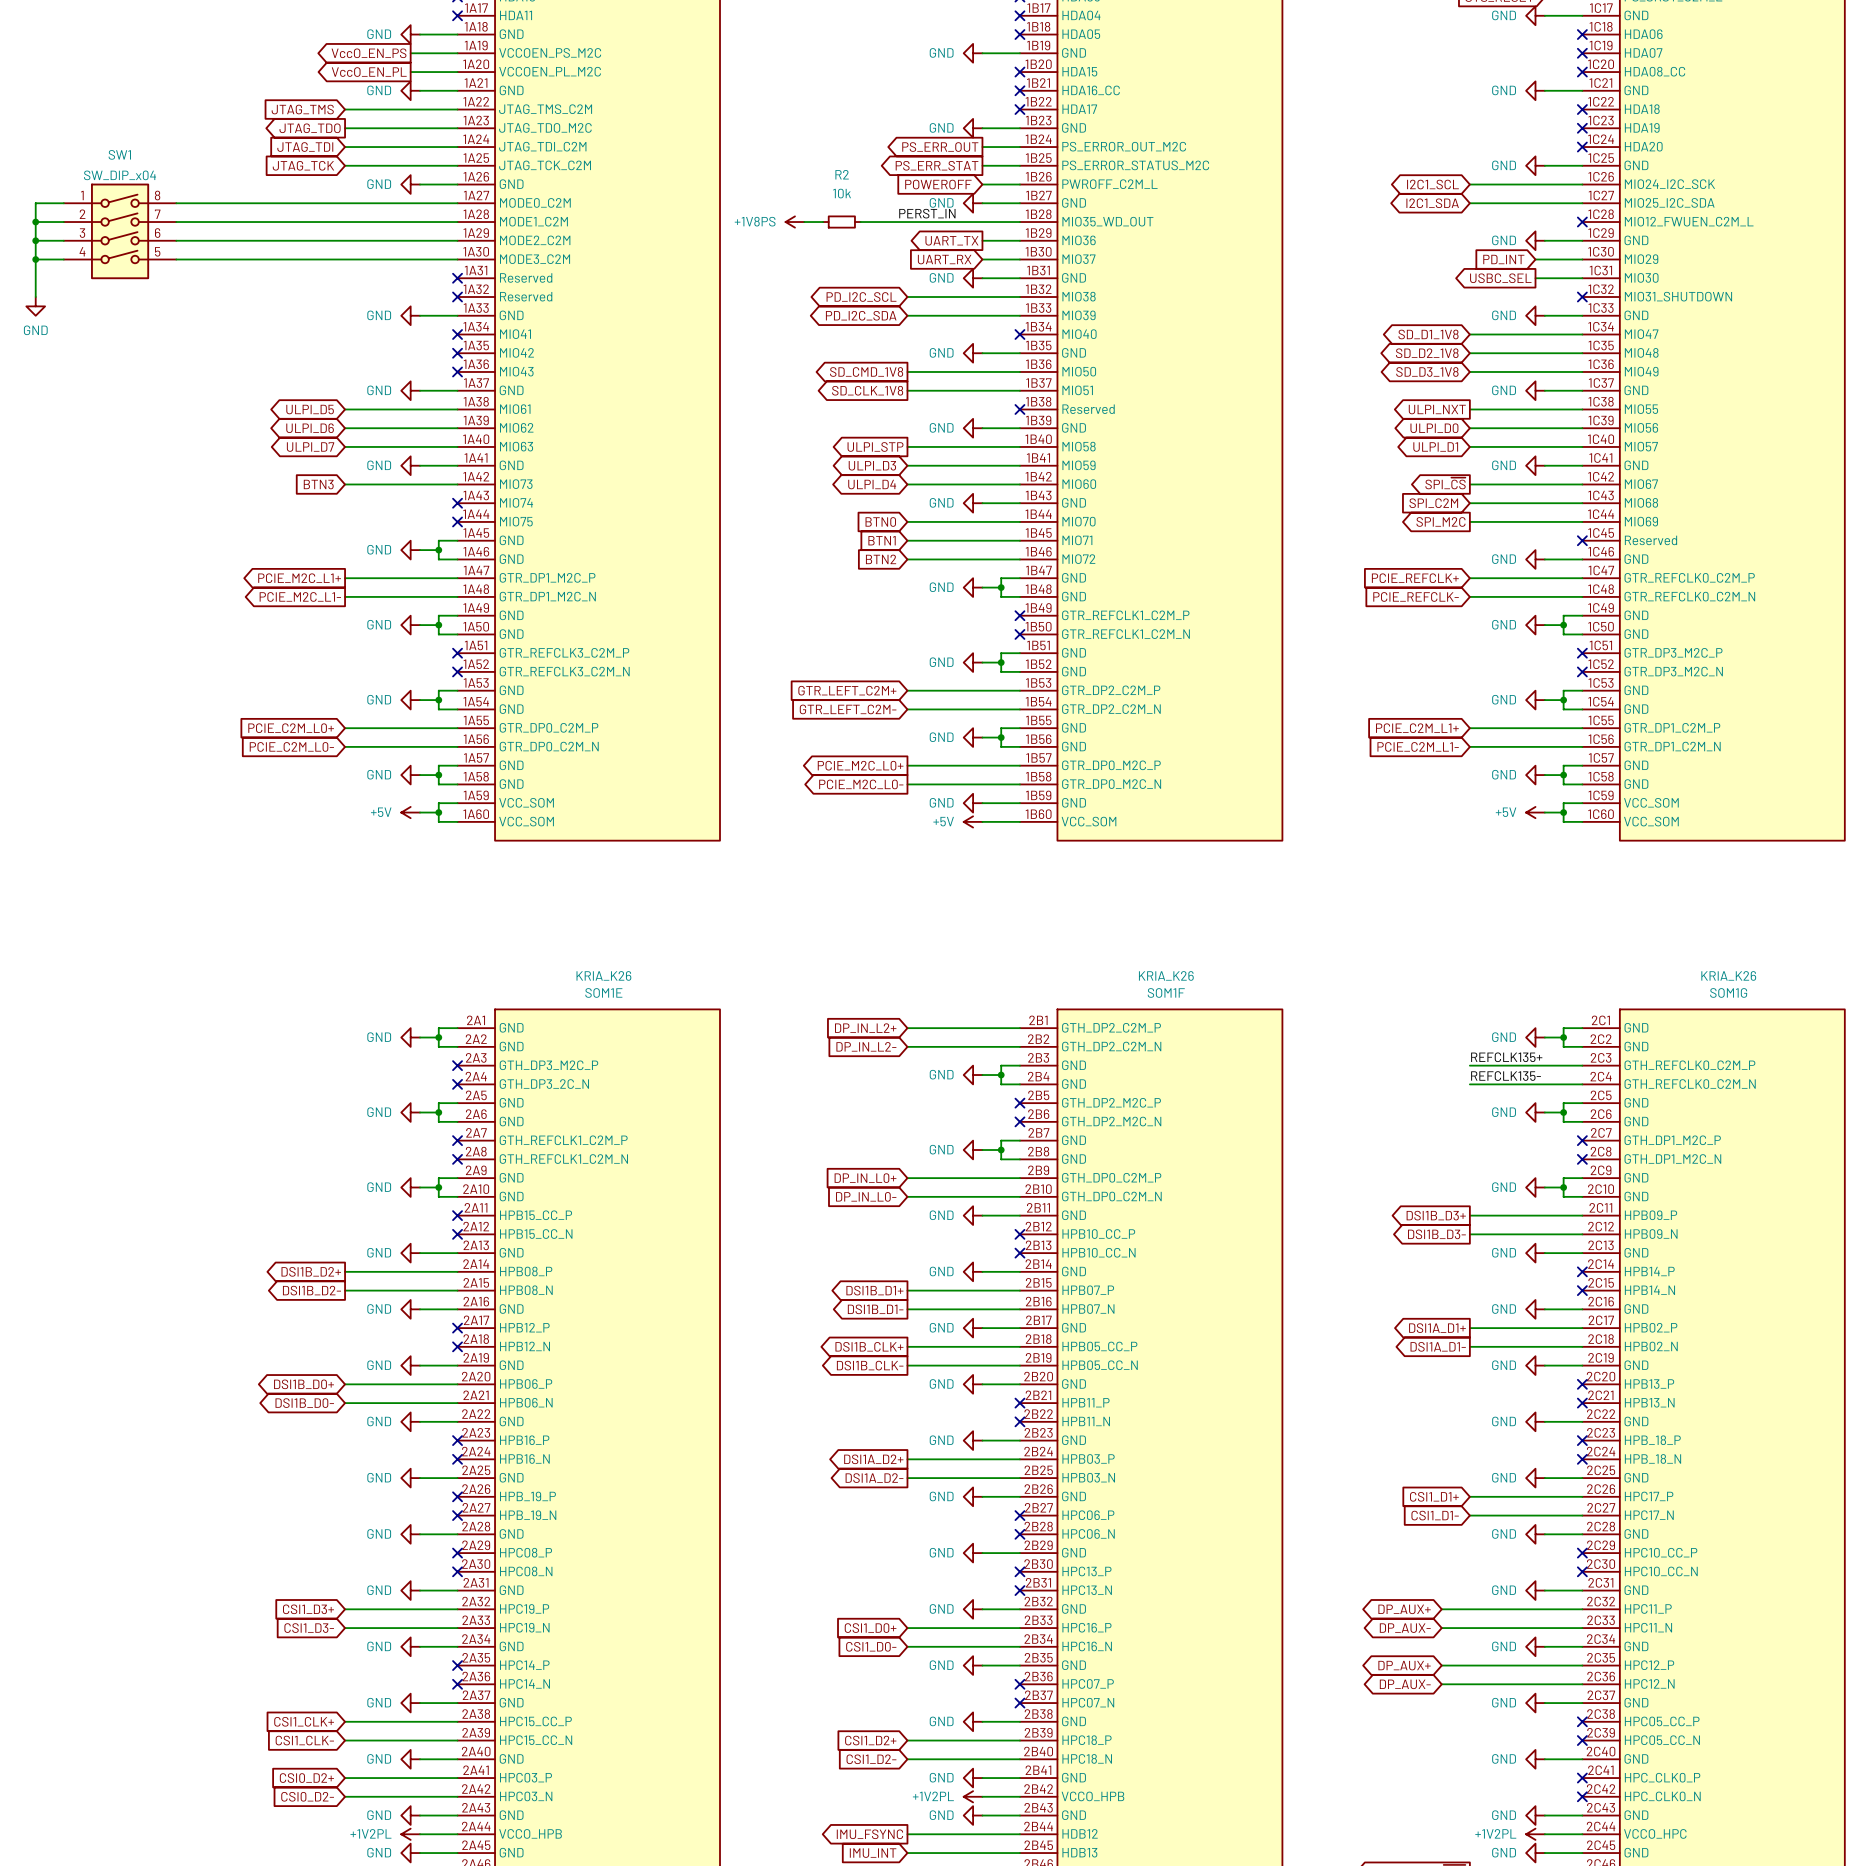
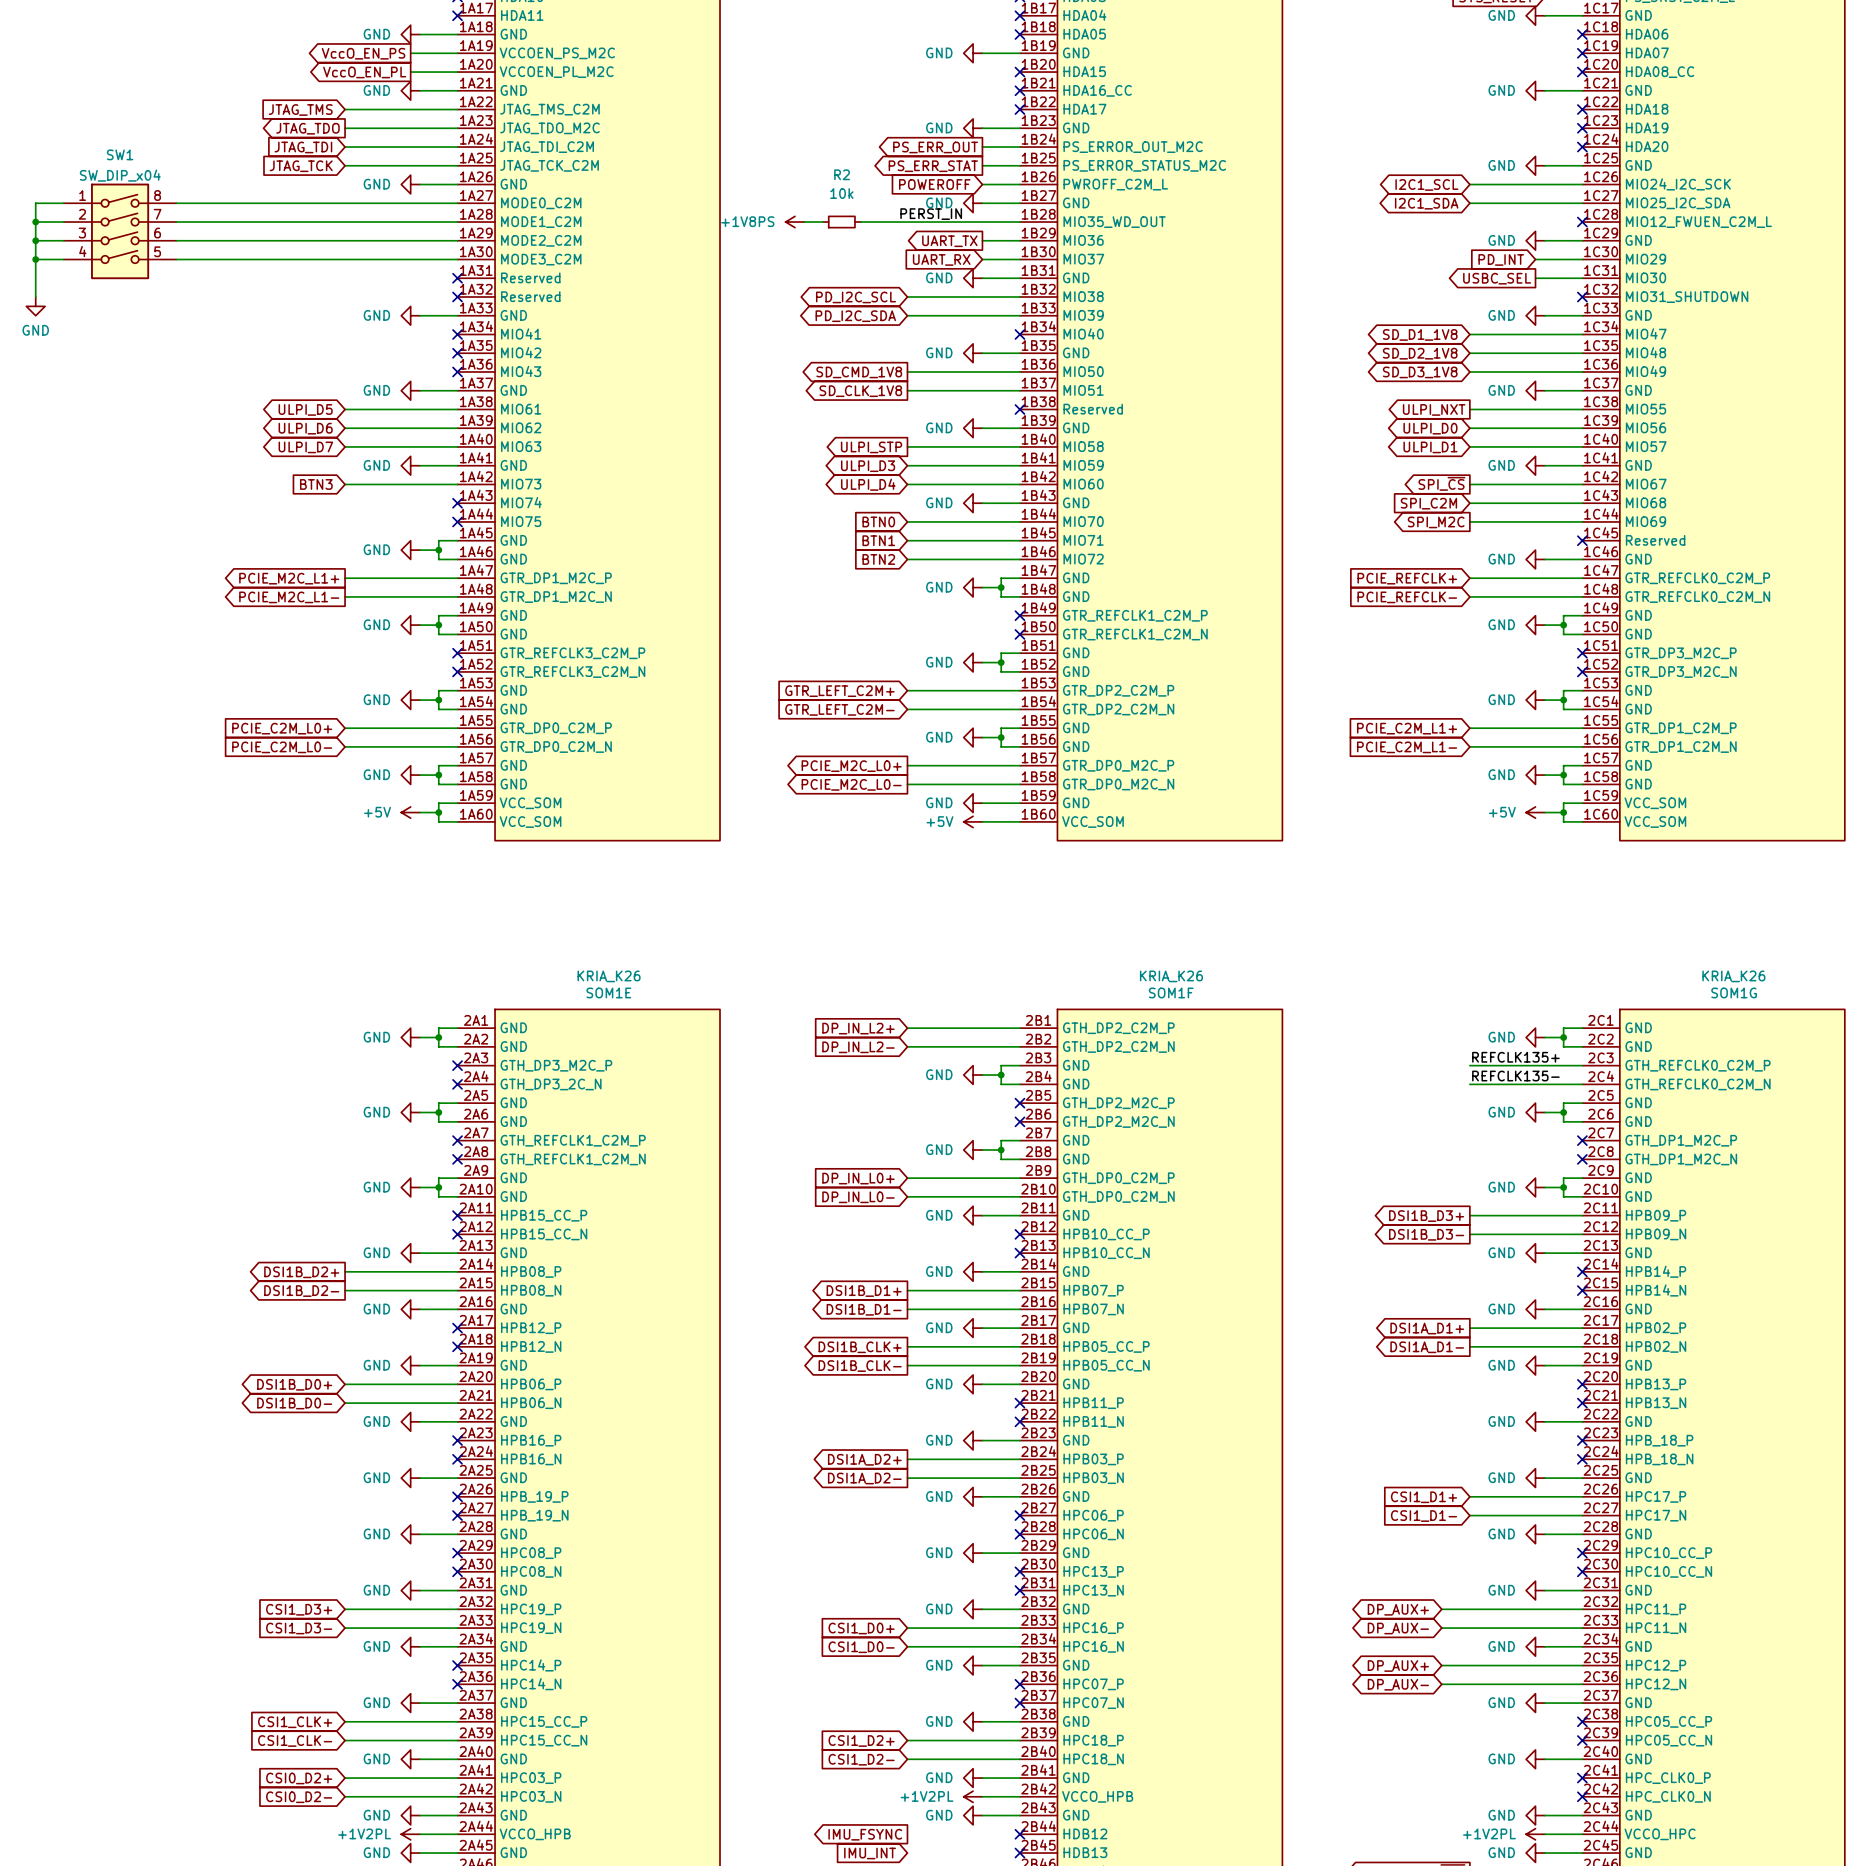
wire: (907, 1834) (1019, 1834) -> none
no-connect mark: none -> (1019, 1834)
wire: (907, 1853) (1019, 1853) -> none
no-connect mark: none -> (1019, 1853)

